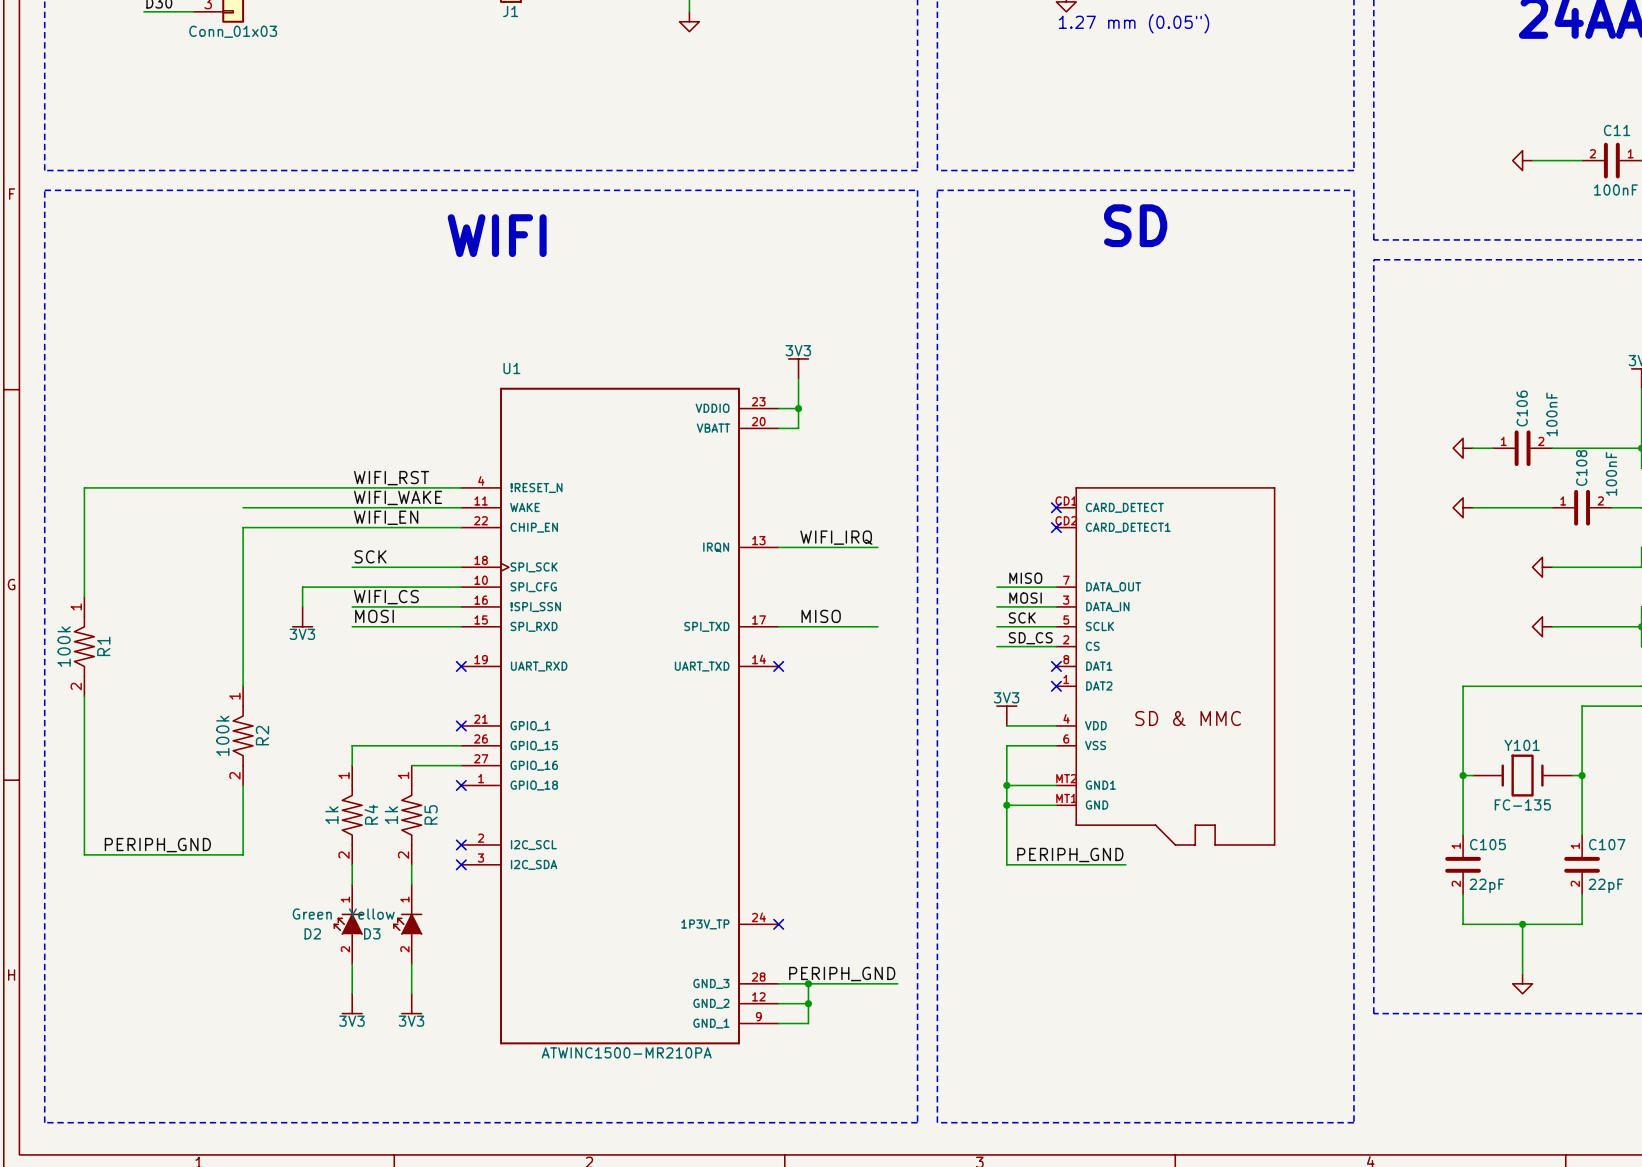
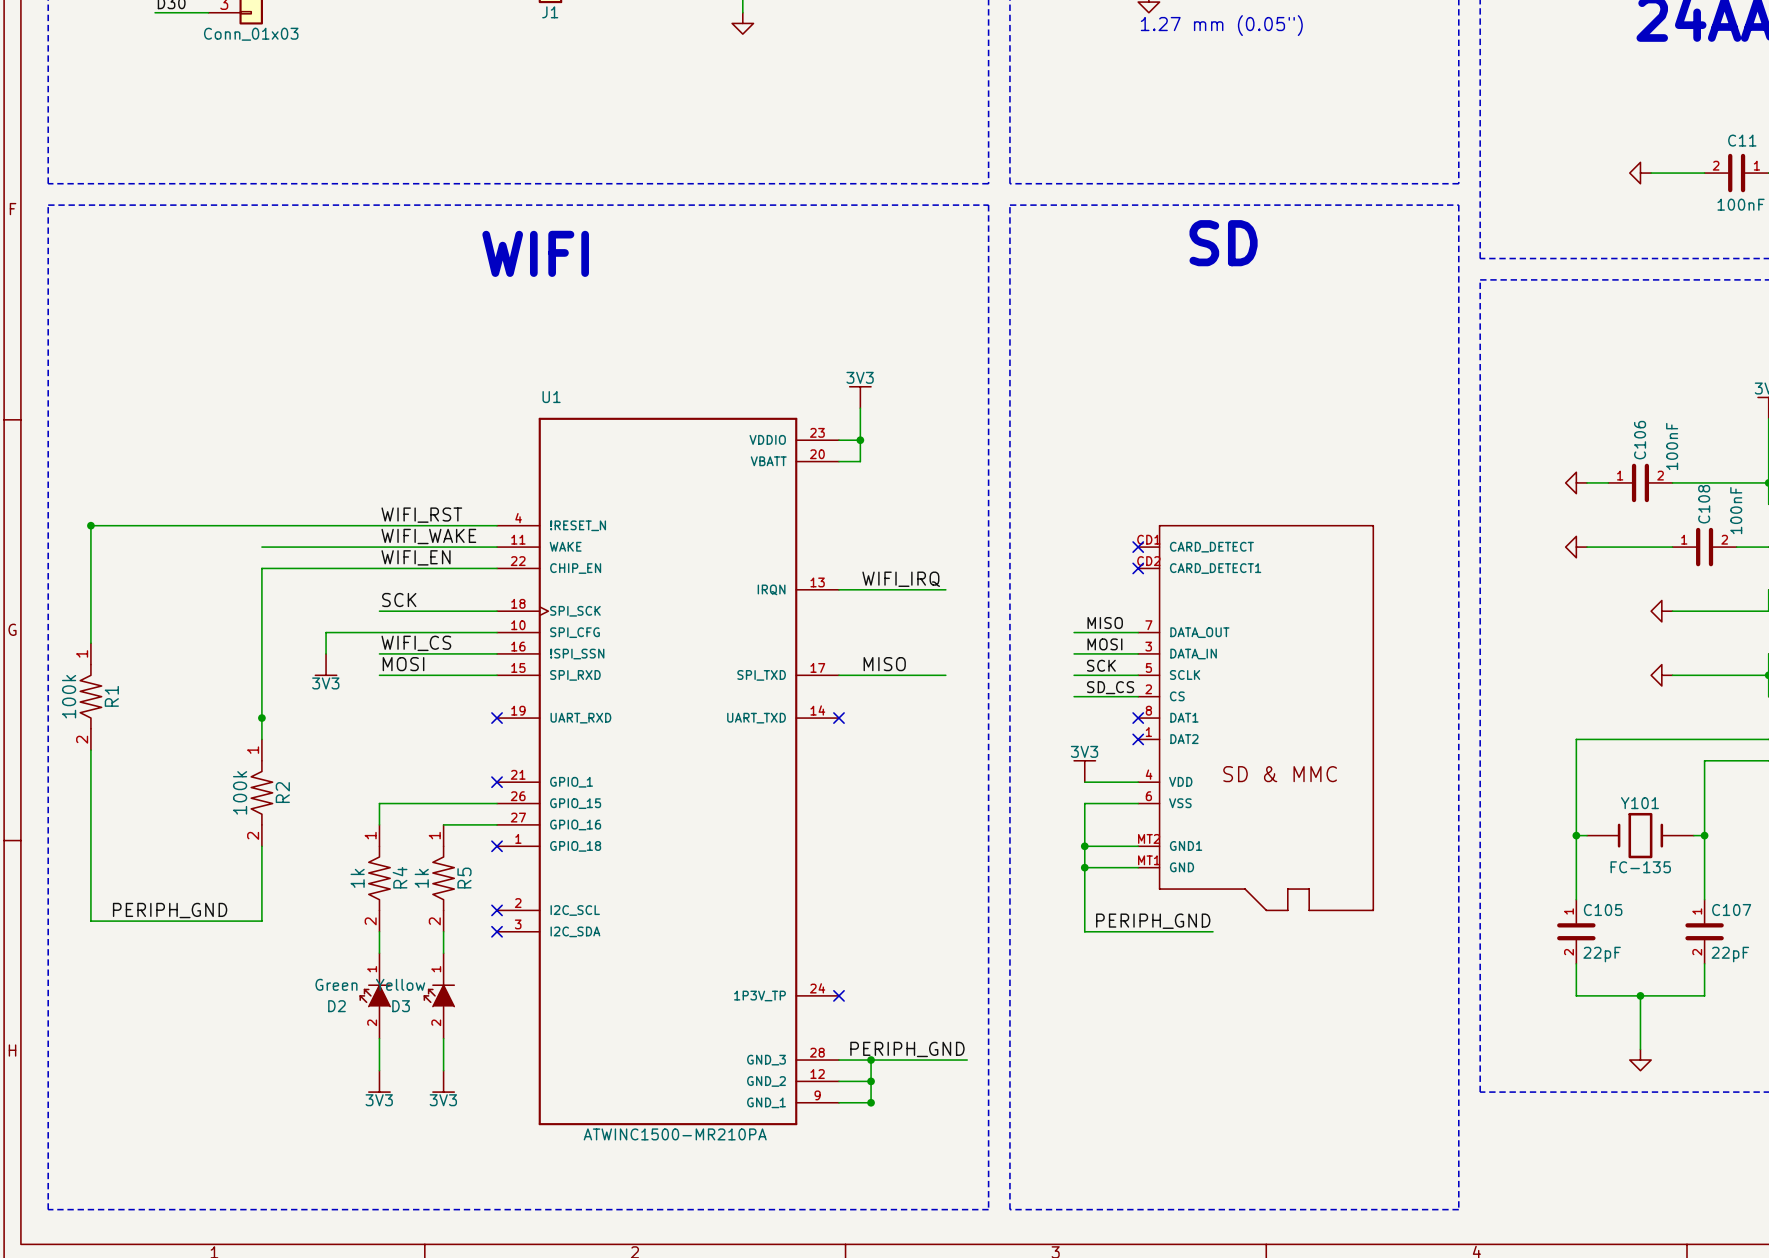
junction: none -> (90, 525)
junction: none -> (261, 718)
junction: none -> (871, 1102)

